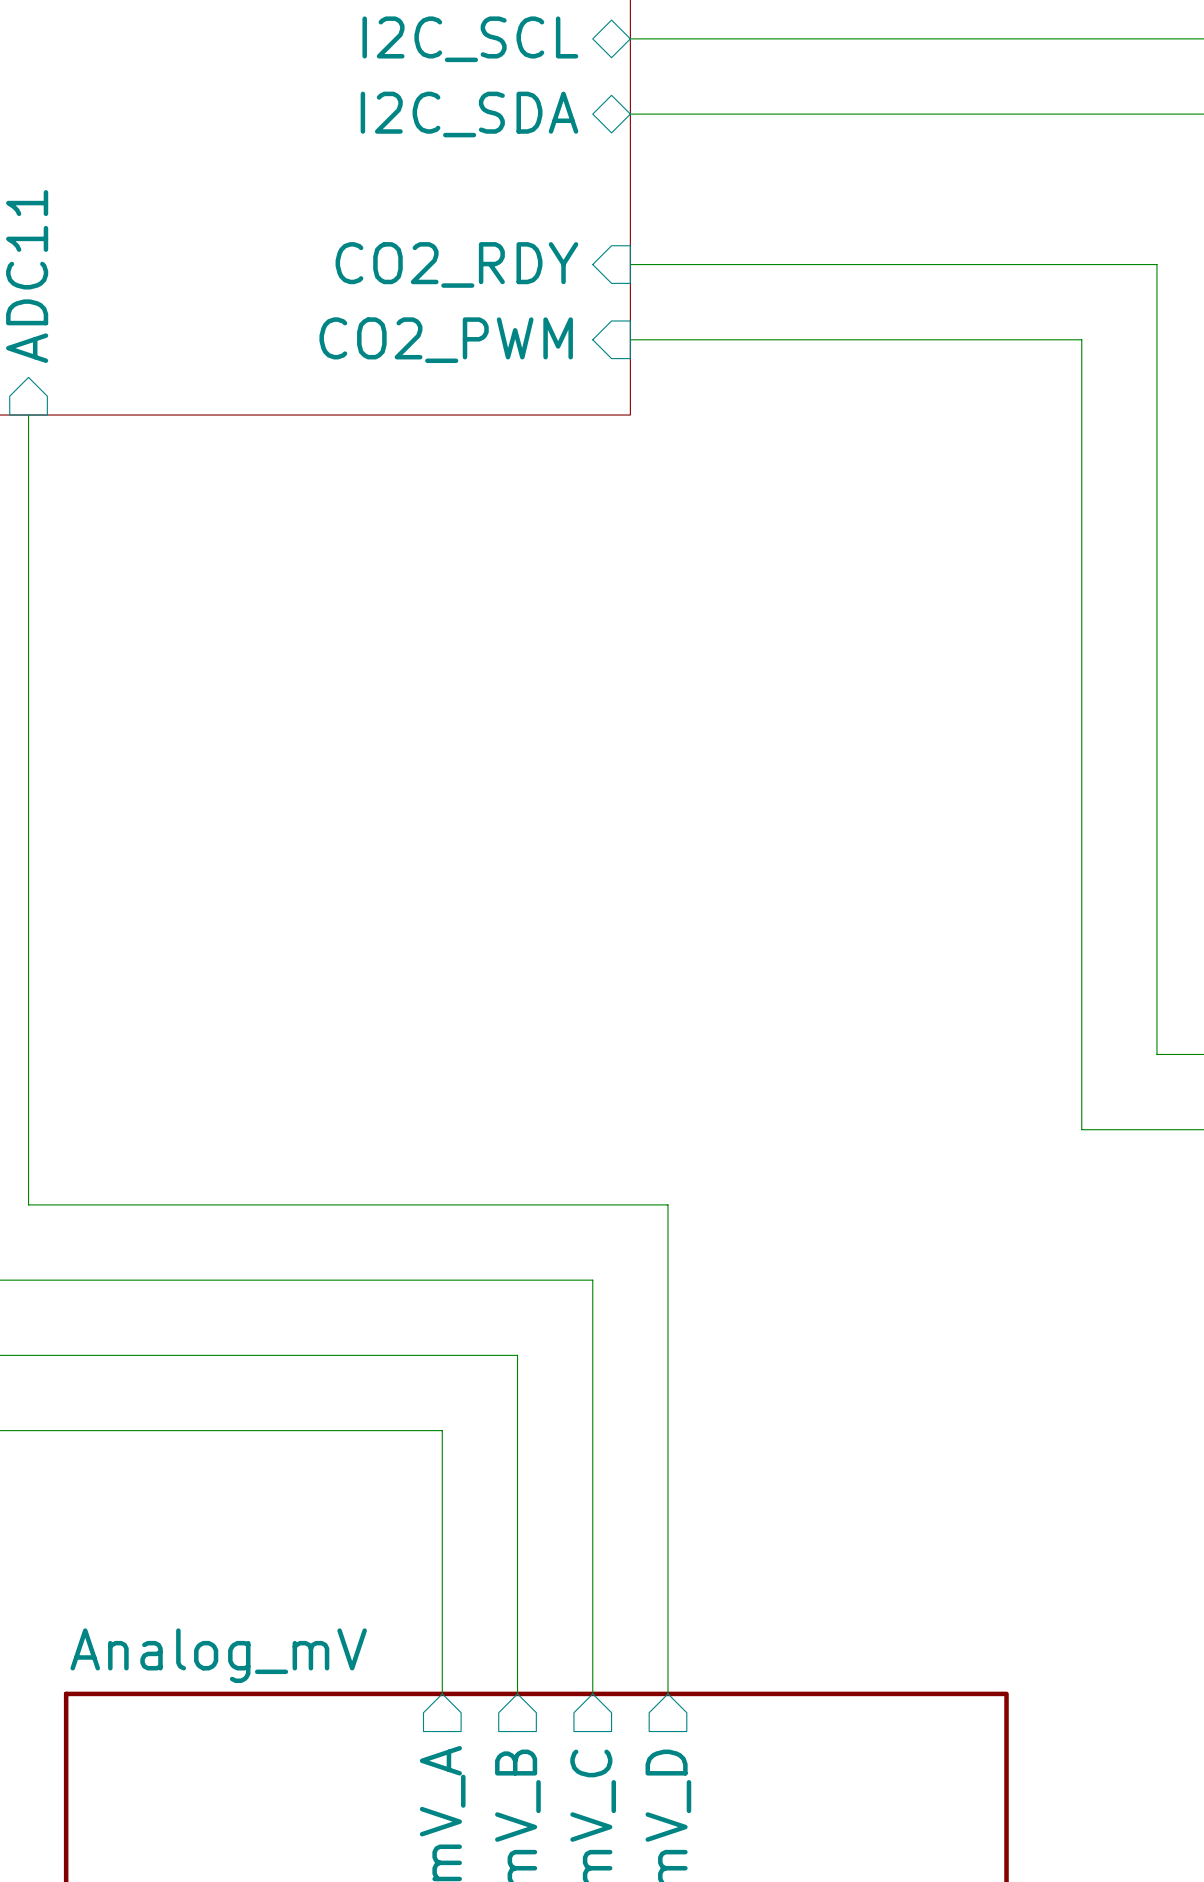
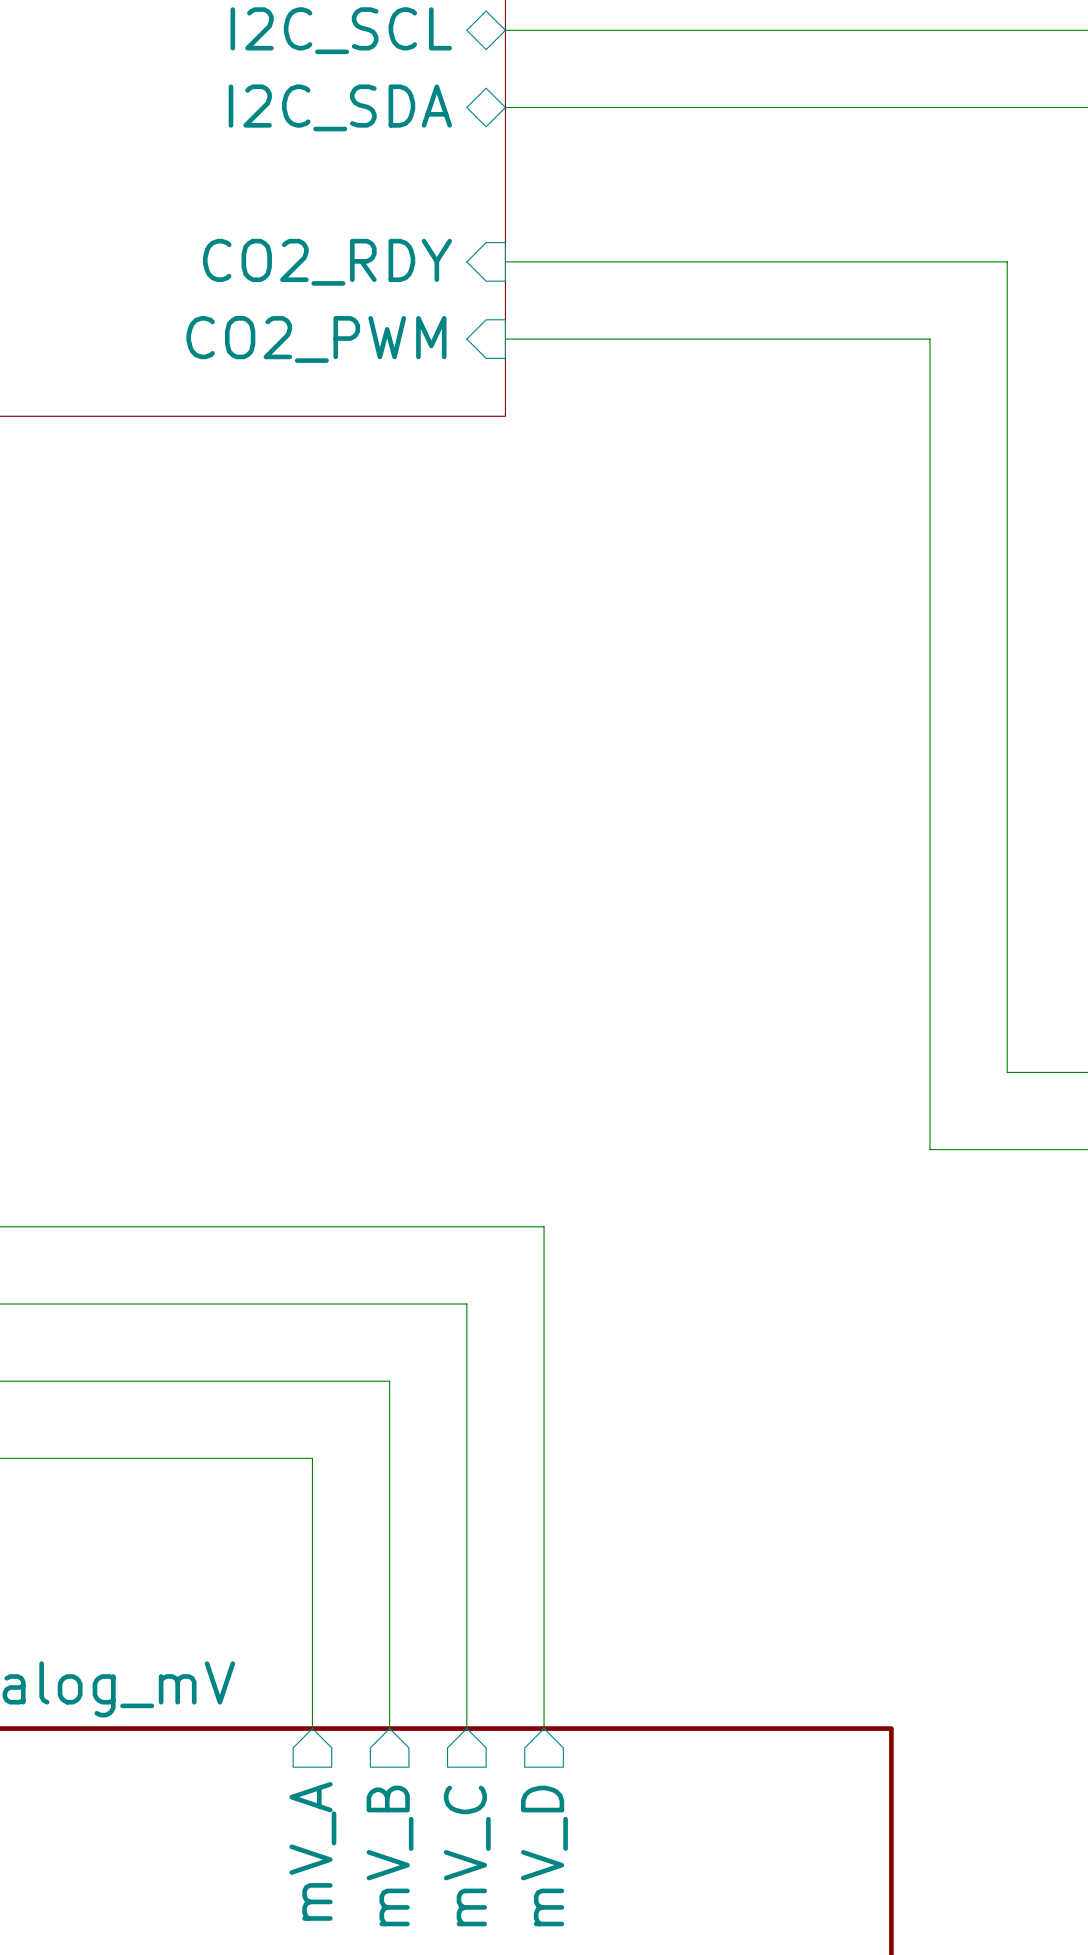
wire: (1119, 264) (1156, 264) (1156, 1054) -> (1007, 261) (1007, 1072) (1045, 1072)
wire: (1044, 339) (1081, 339) (1081, 1129) -> (930, 339) (930, 1149) (968, 1149)

